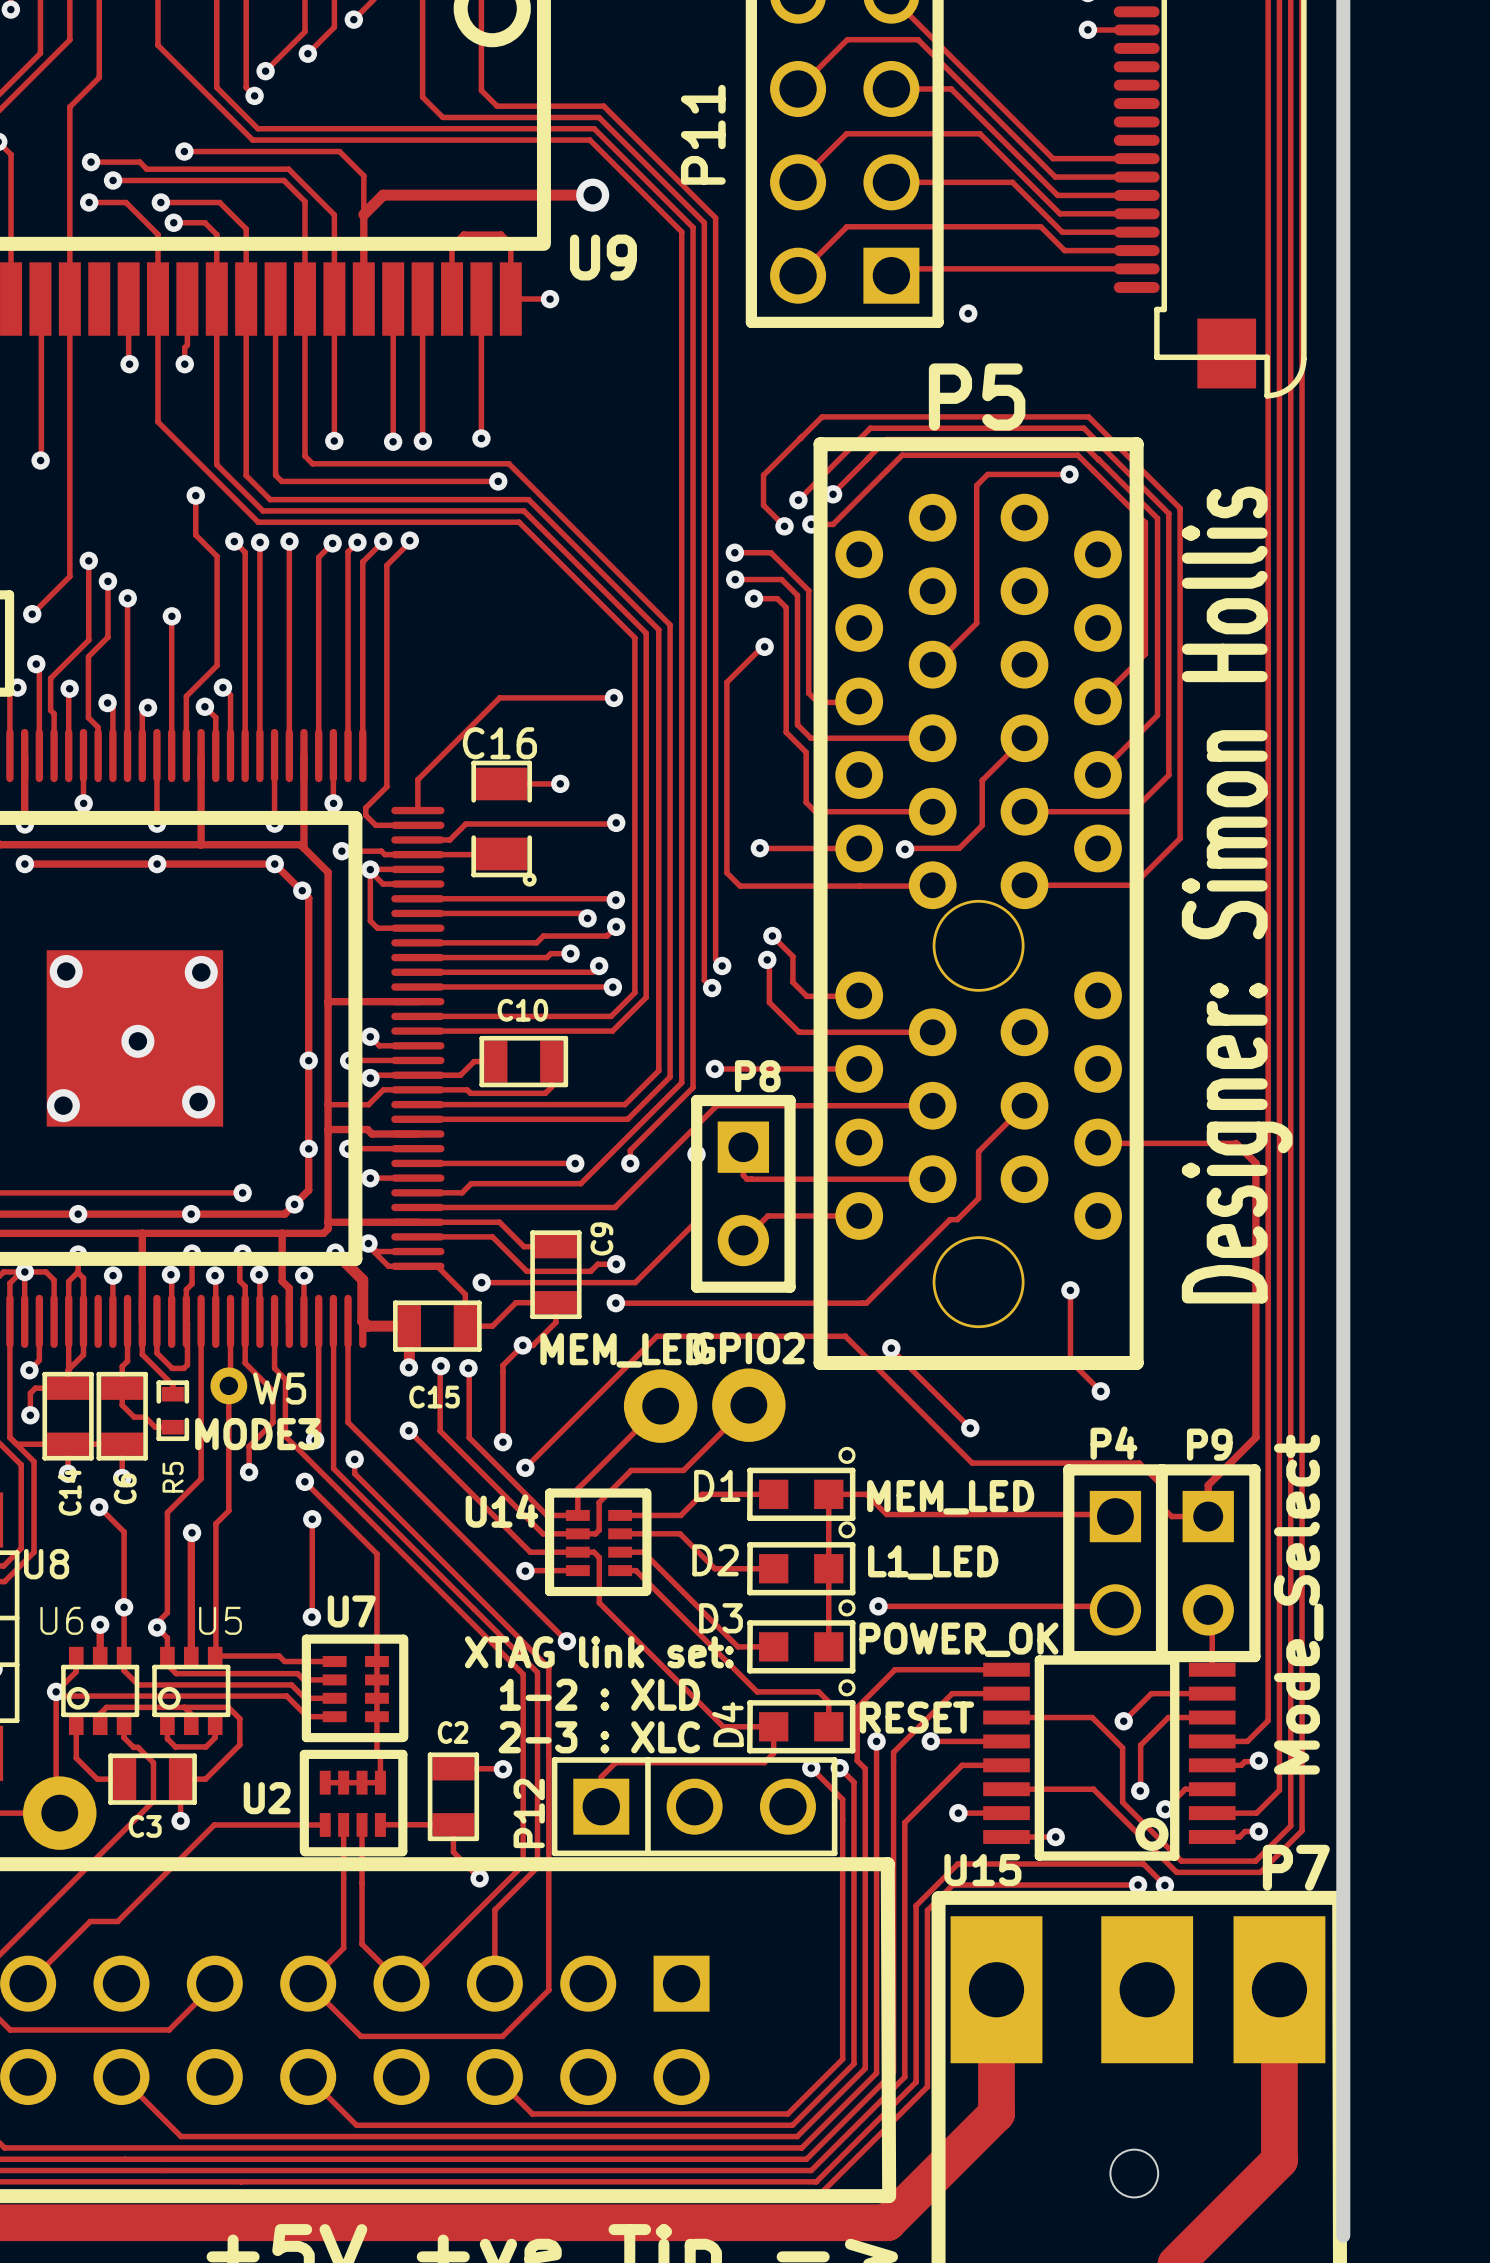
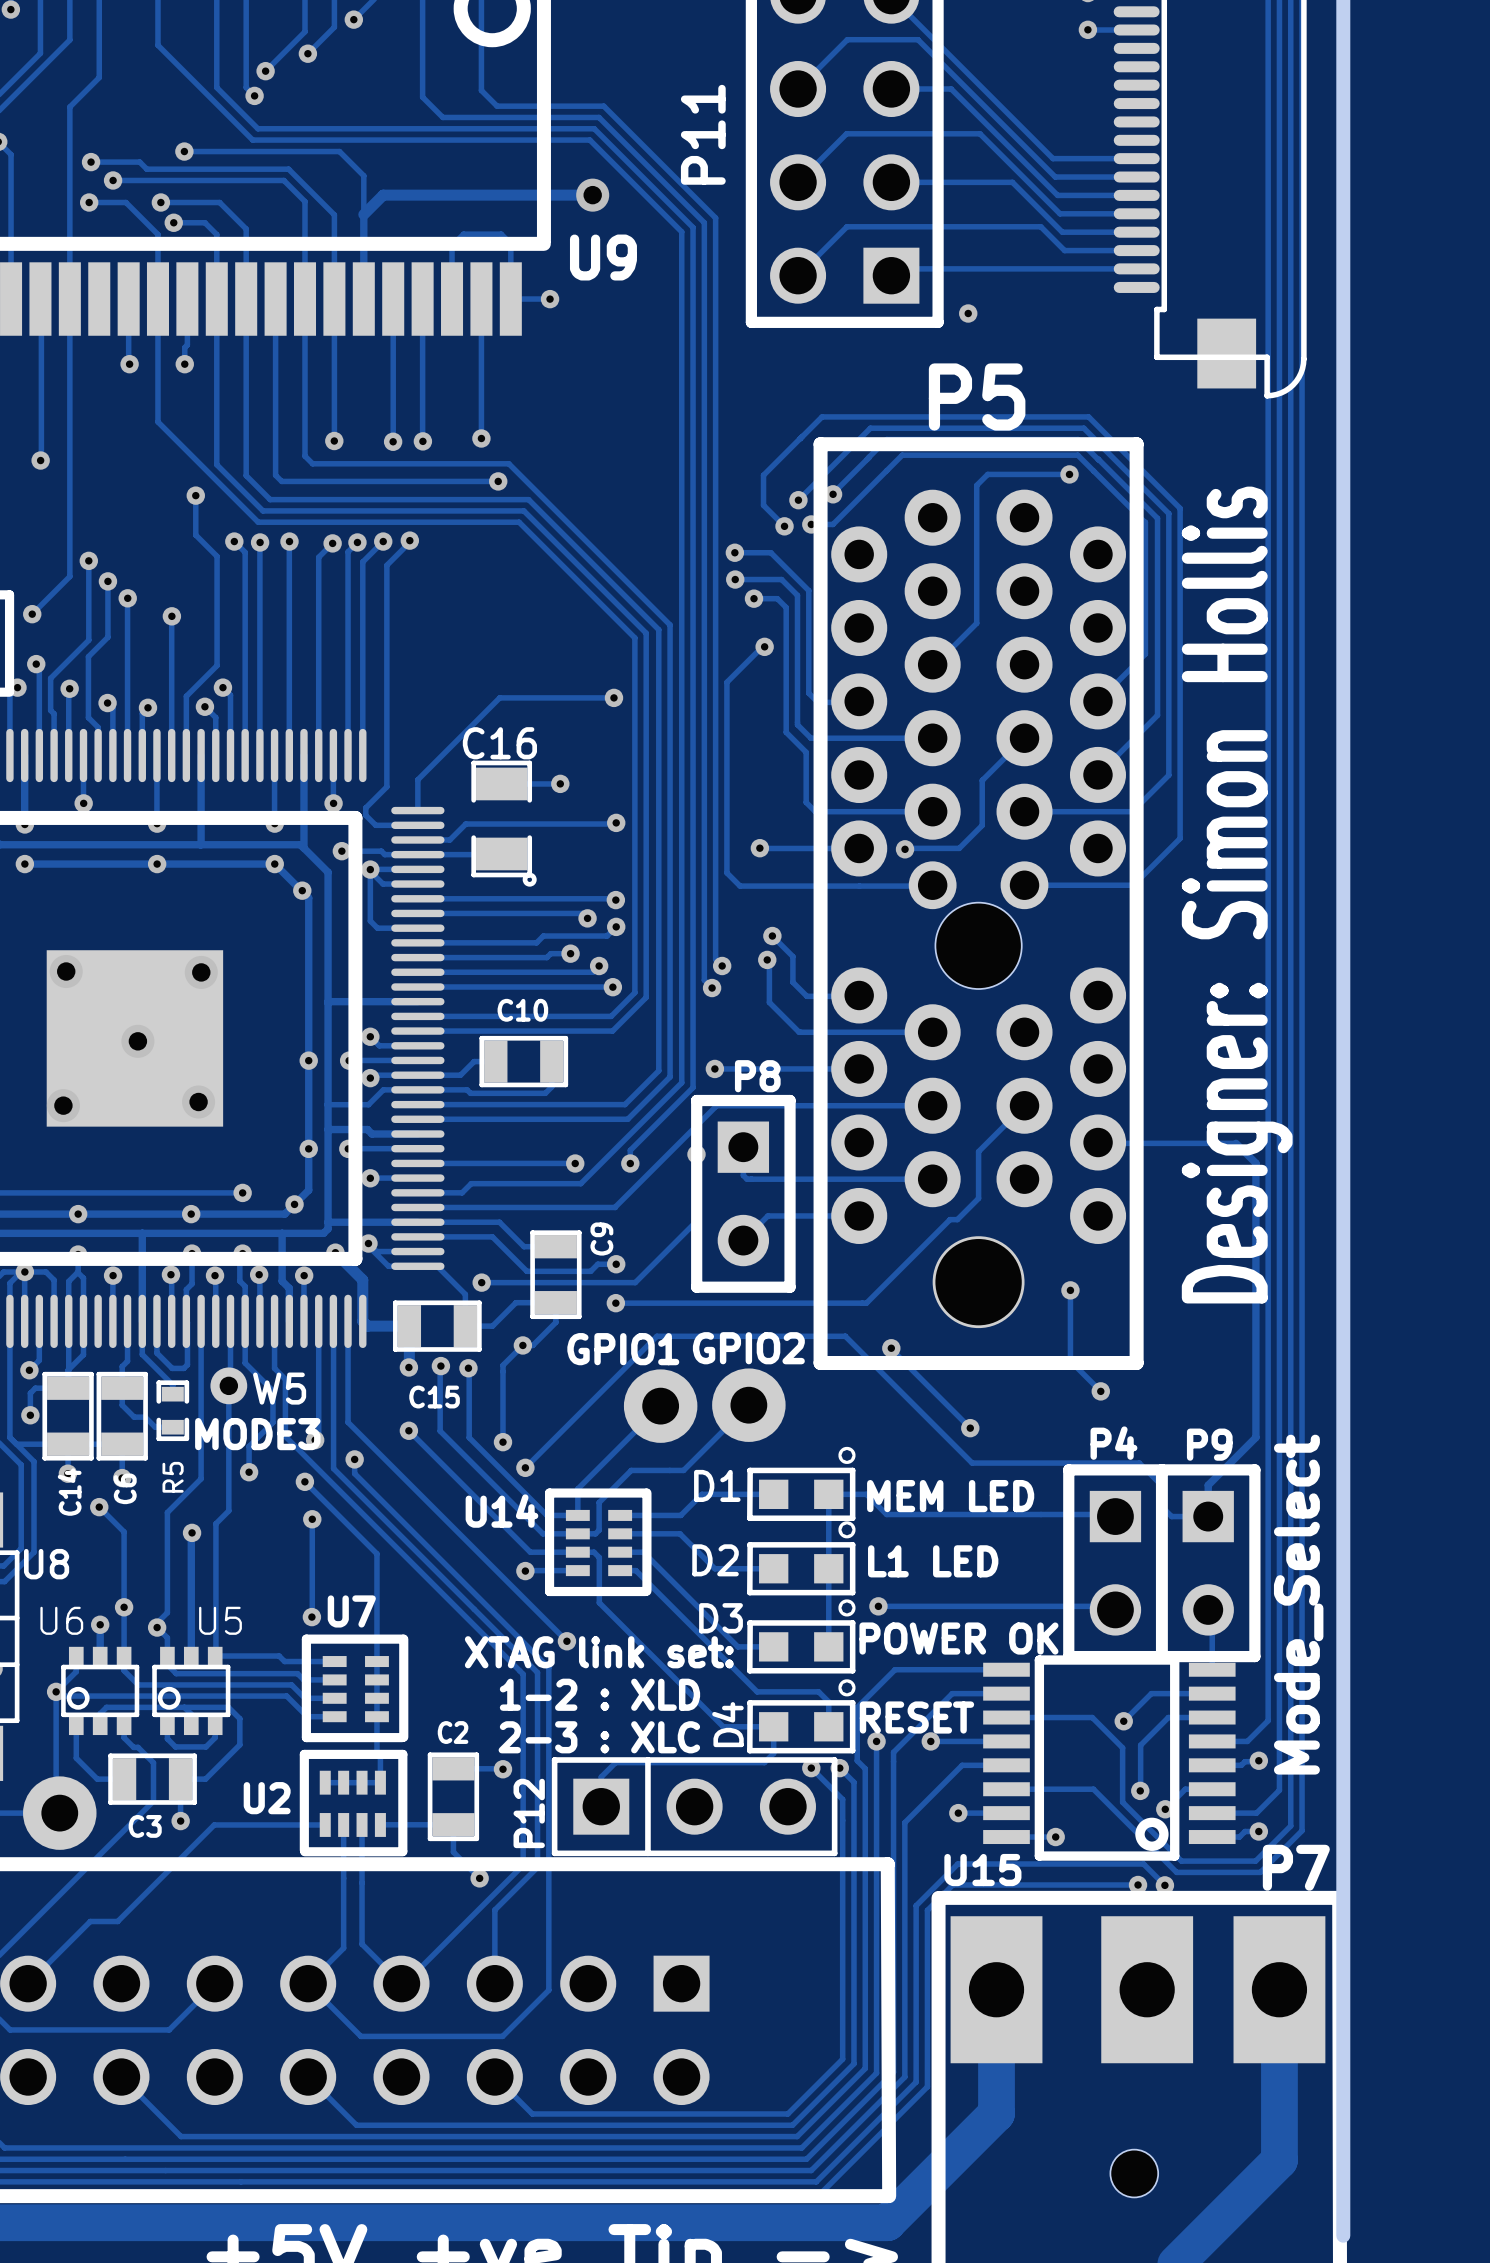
P5 footprint: [813, 437, 1144, 1371] -> [813, 437, 1144, 1371]
part value: MEM_LED (623, 1350) -> GPIO1 (623, 1349)
D1 value: MEM_LED (950, 1497) -> MEM LED (950, 1496)
D2 value: L1_LED (933, 1562) -> L1 LED (933, 1561)
D3 value: POWER_OK (958, 1639) -> POWER OK (958, 1638)

